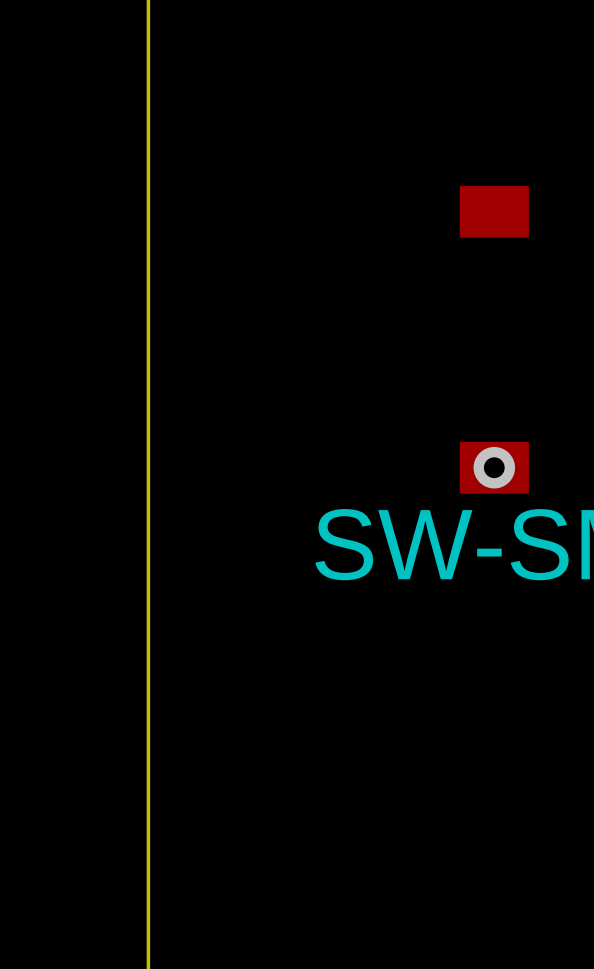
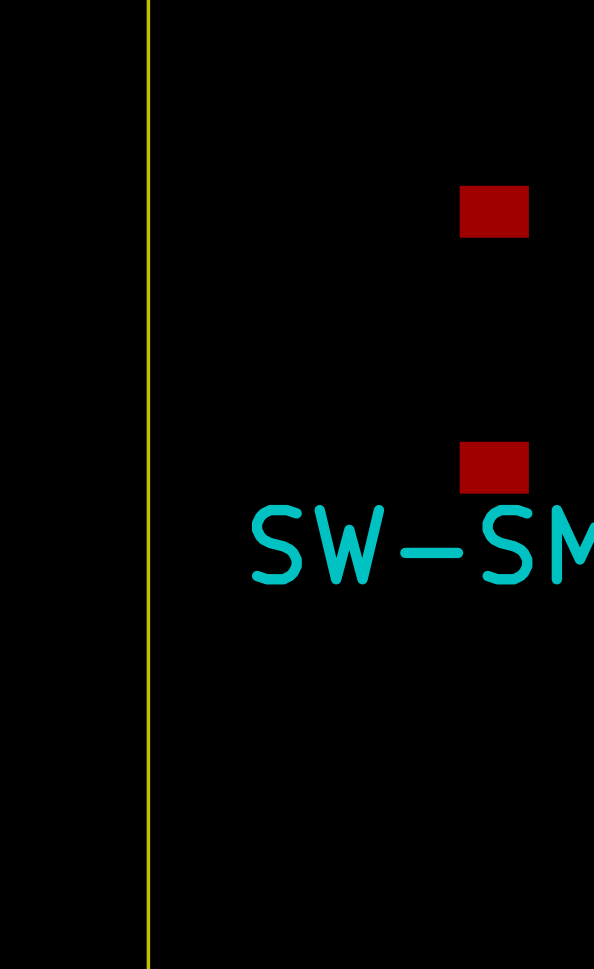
via: (494, 467) -> none

